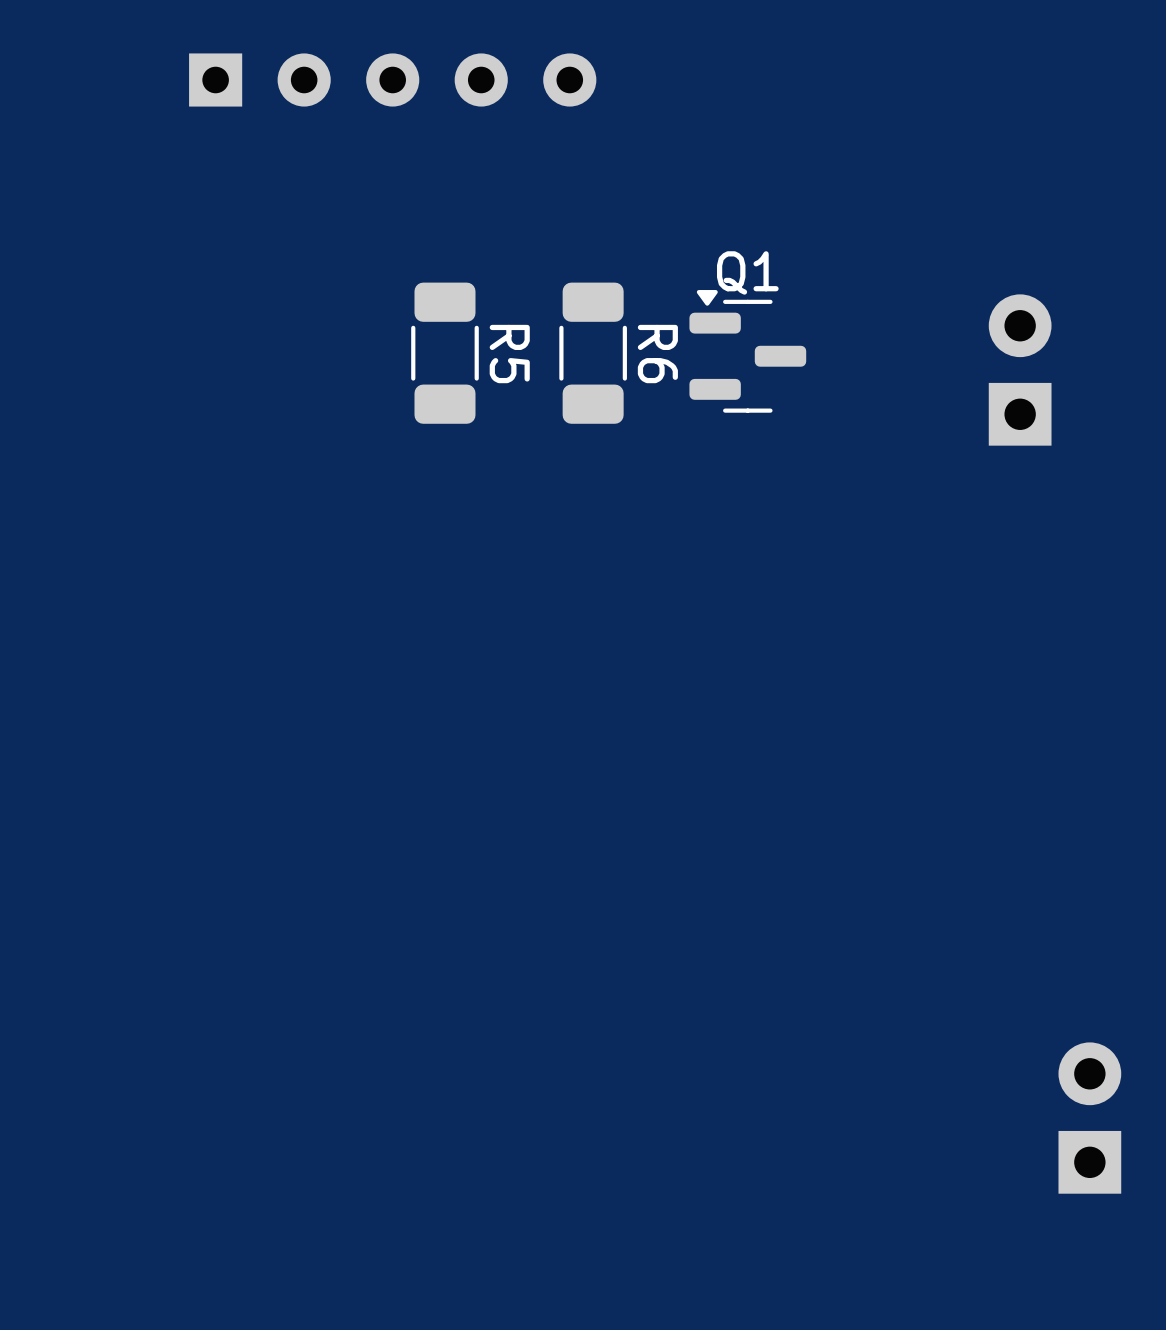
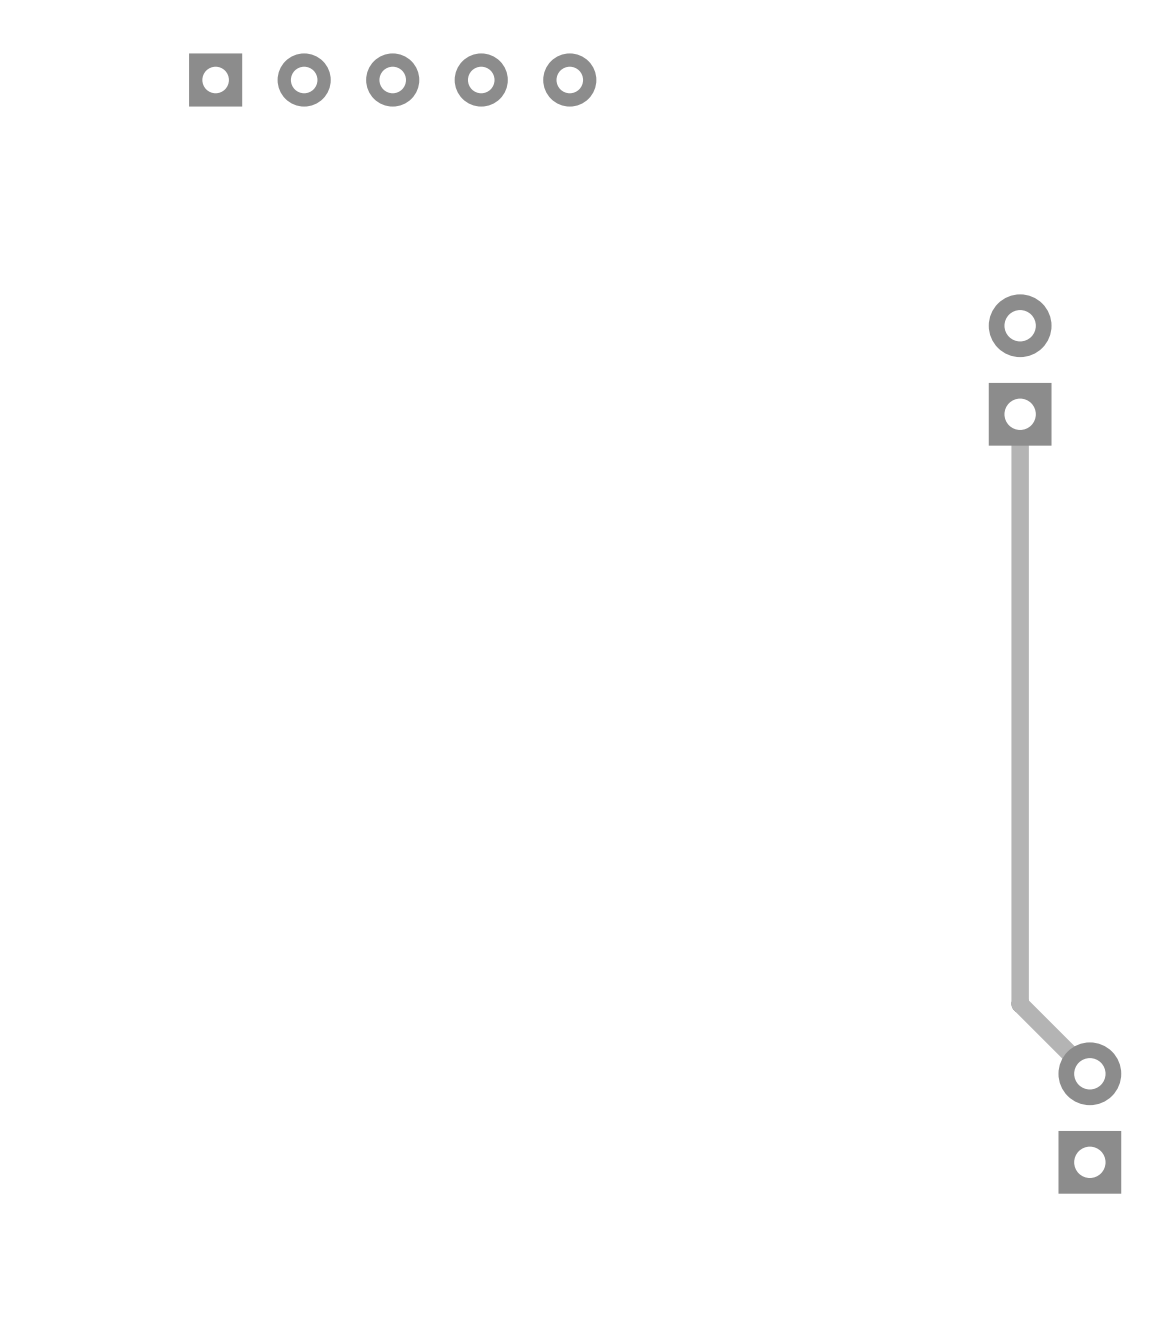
Q1: (747, 351) -> none
R5: (444, 353) -> none
R6: (593, 353) -> none
track: none -> (1020, 414) (1020, 1004) (1089, 1073)

